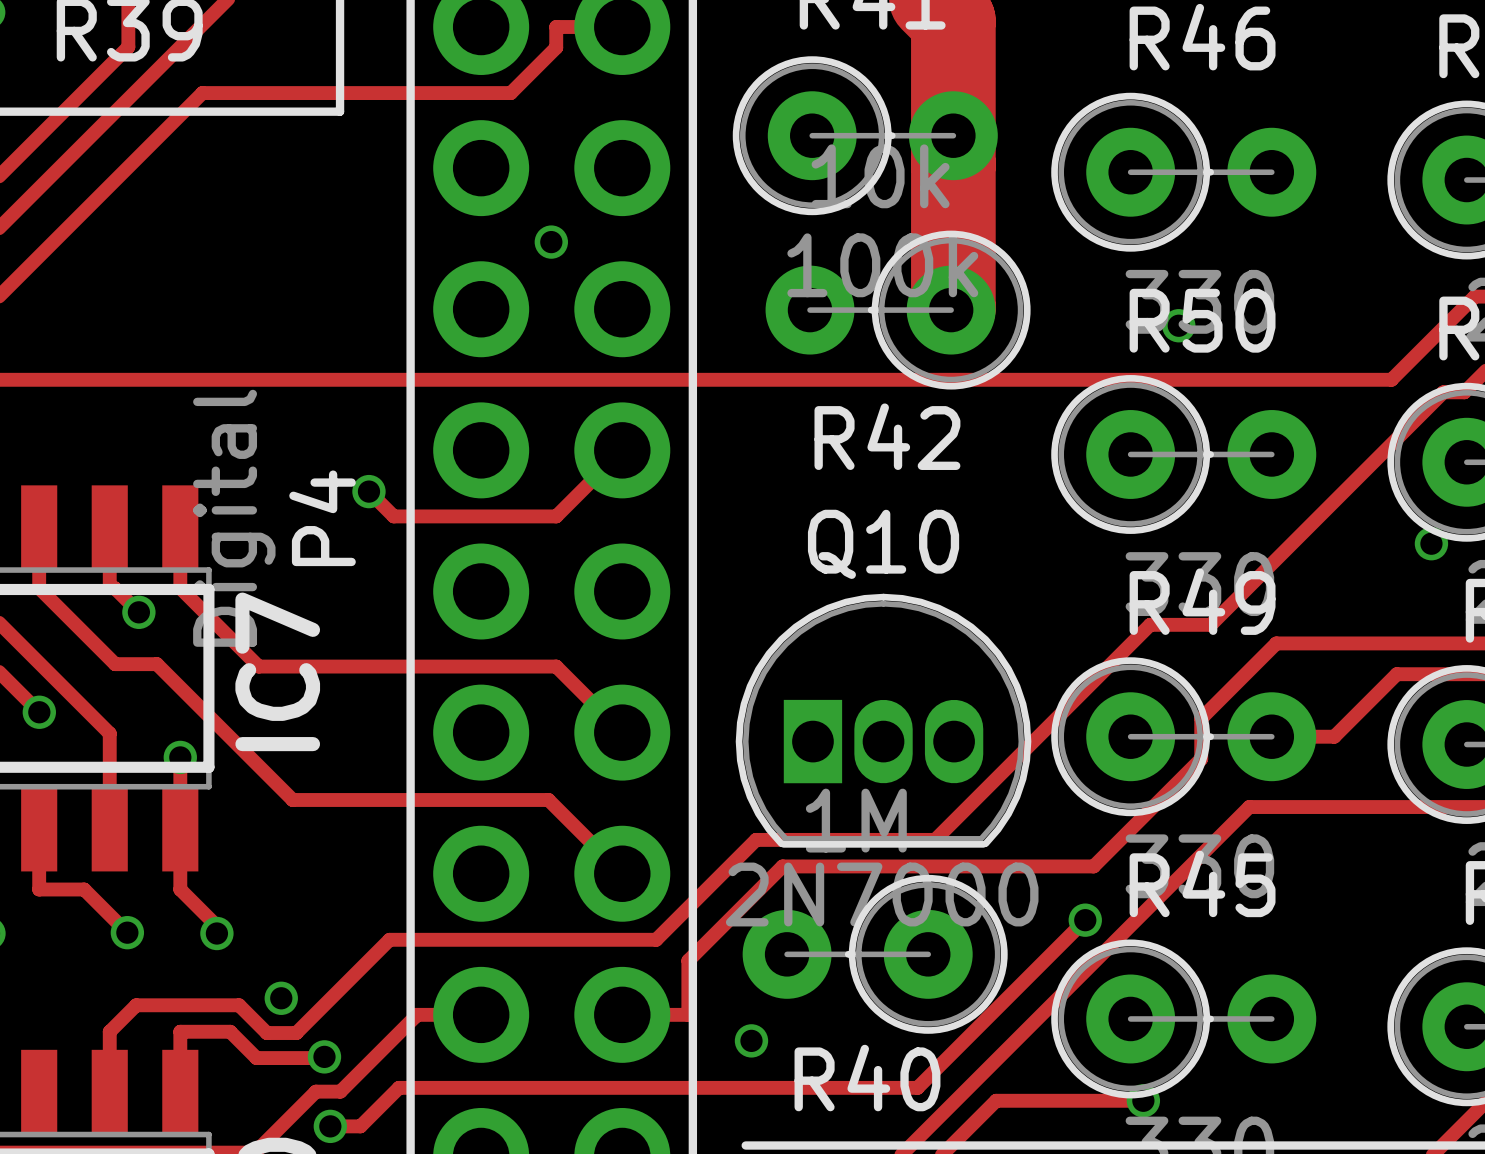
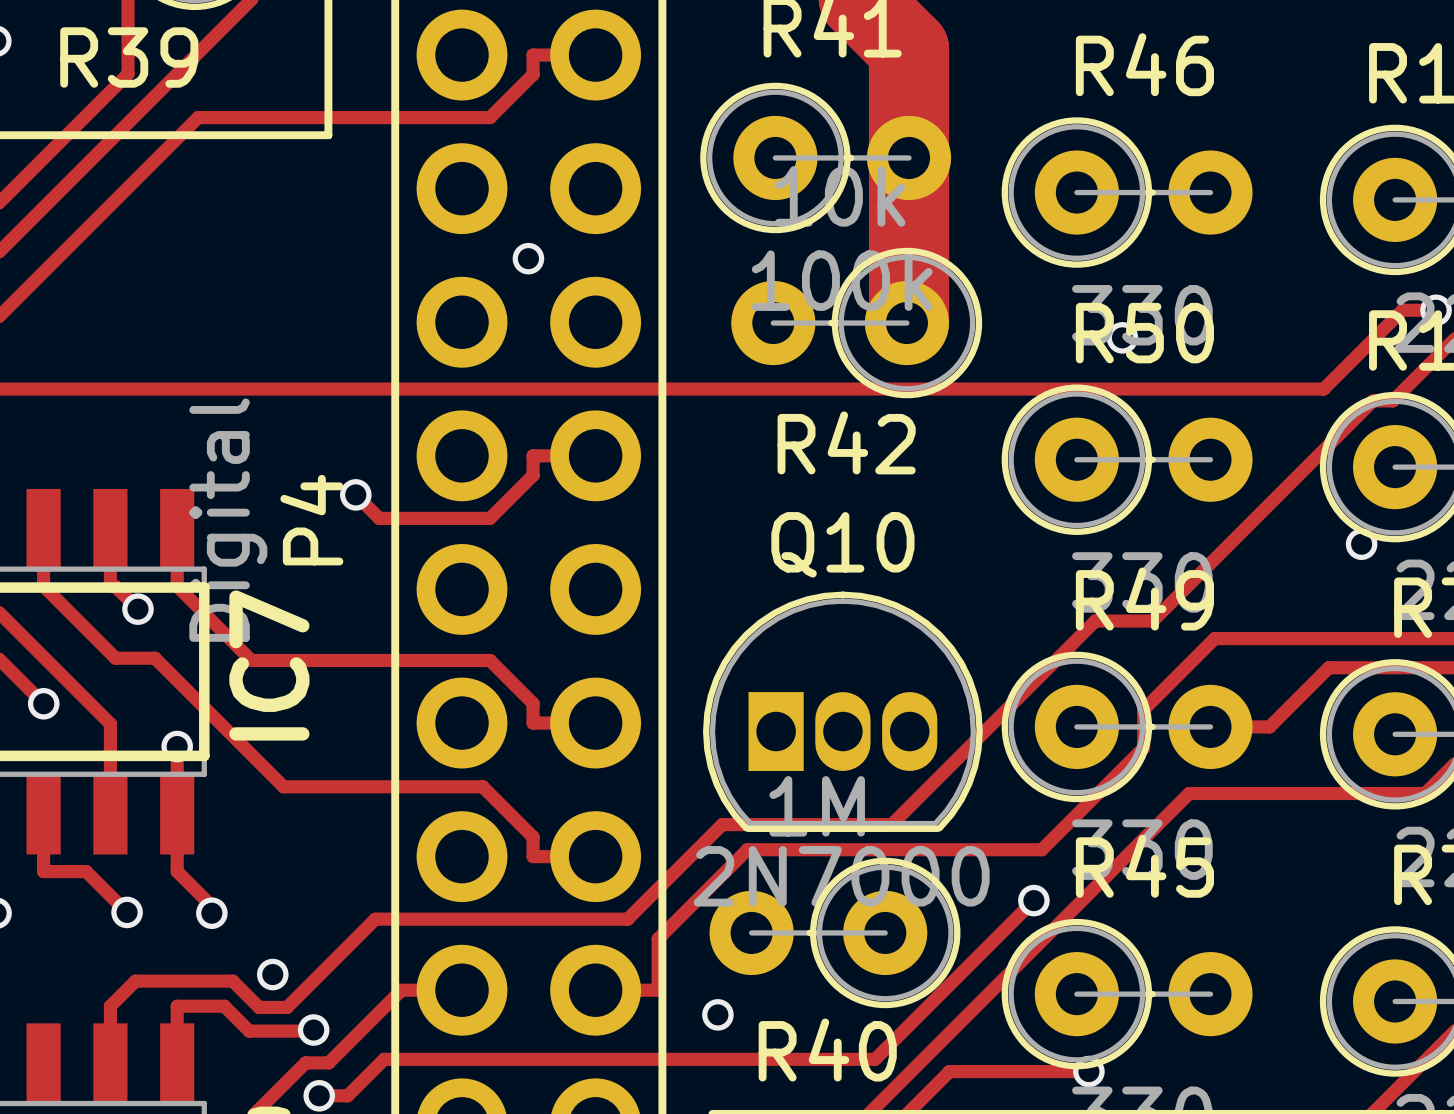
track: (622, 450) (556, 516) (510, 516) -> (595, 455) (533, 455) (533, 475) (490, 518)
track: (510, 666) (556, 666) (622, 732) -> (490, 660) (533, 703) (533, 723) (595, 723)
track: (503, 799) (548, 799) (622, 873) -> (482, 786) (533, 837) (533, 856) (595, 856)

